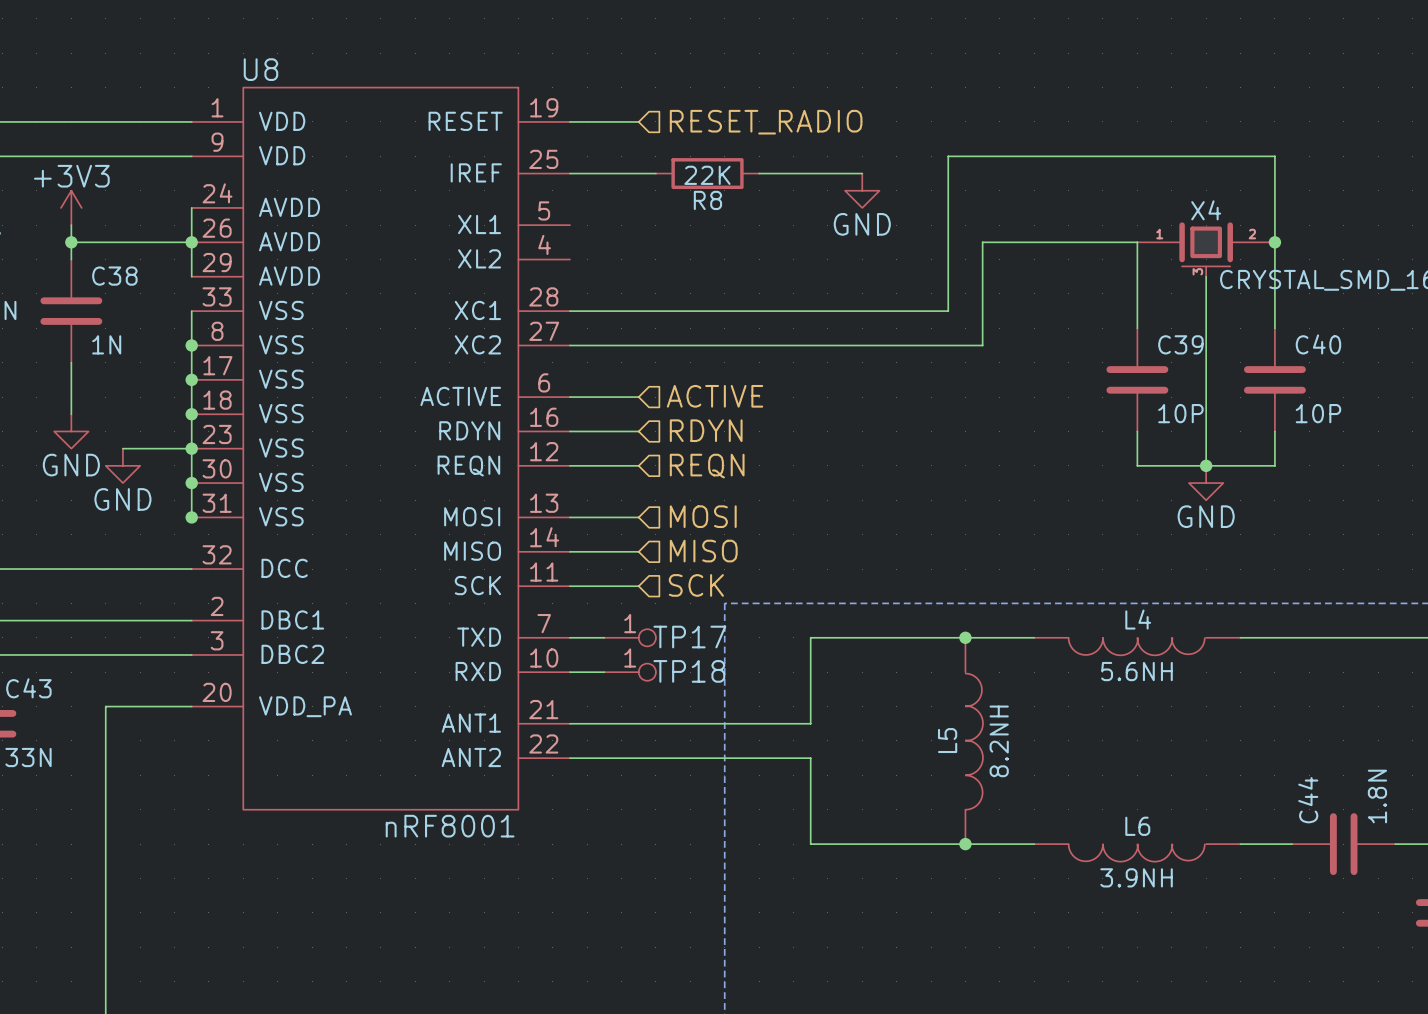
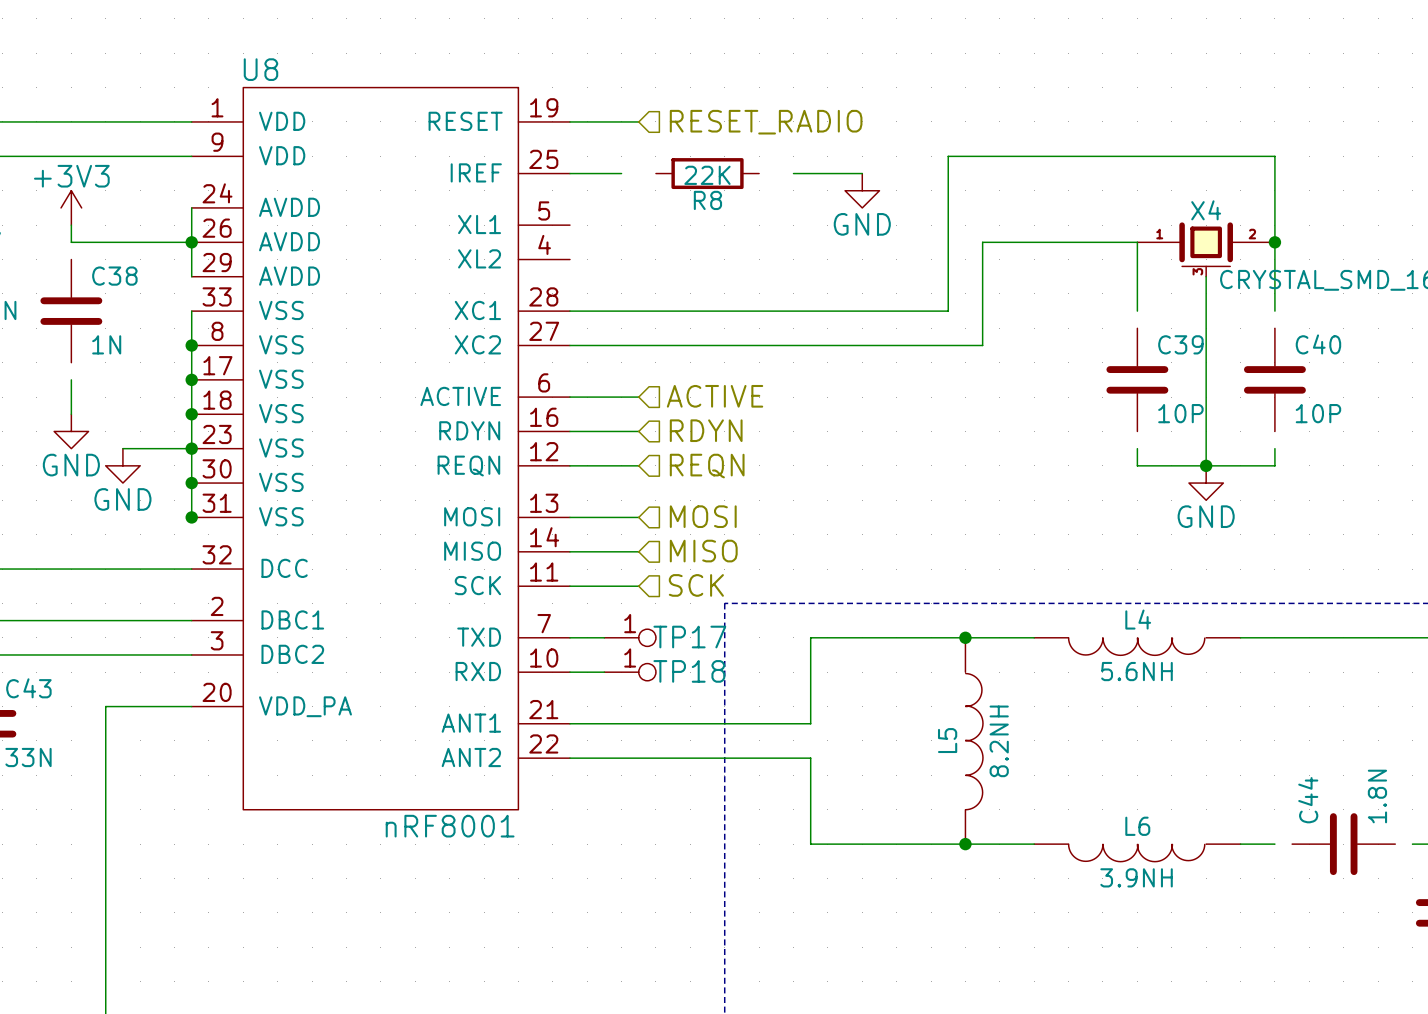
wire: (621, 173) (655, 173) -> none
wire: (759, 173) (793, 173) -> none
wire: (71, 242) (71, 259) -> none
junction: (71, 242) -> none
wire: (1137, 311) (1137, 328) -> none
wire: (1274, 311) (1274, 328) -> none
wire: (71, 362) (71, 379) -> none
wire: (1137, 431) (1137, 448) -> none
wire: (1274, 431) (1274, 448) -> none
wire: (1274, 844) (1292, 844) -> none
wire: (1395, 844) (1412, 844) -> none

